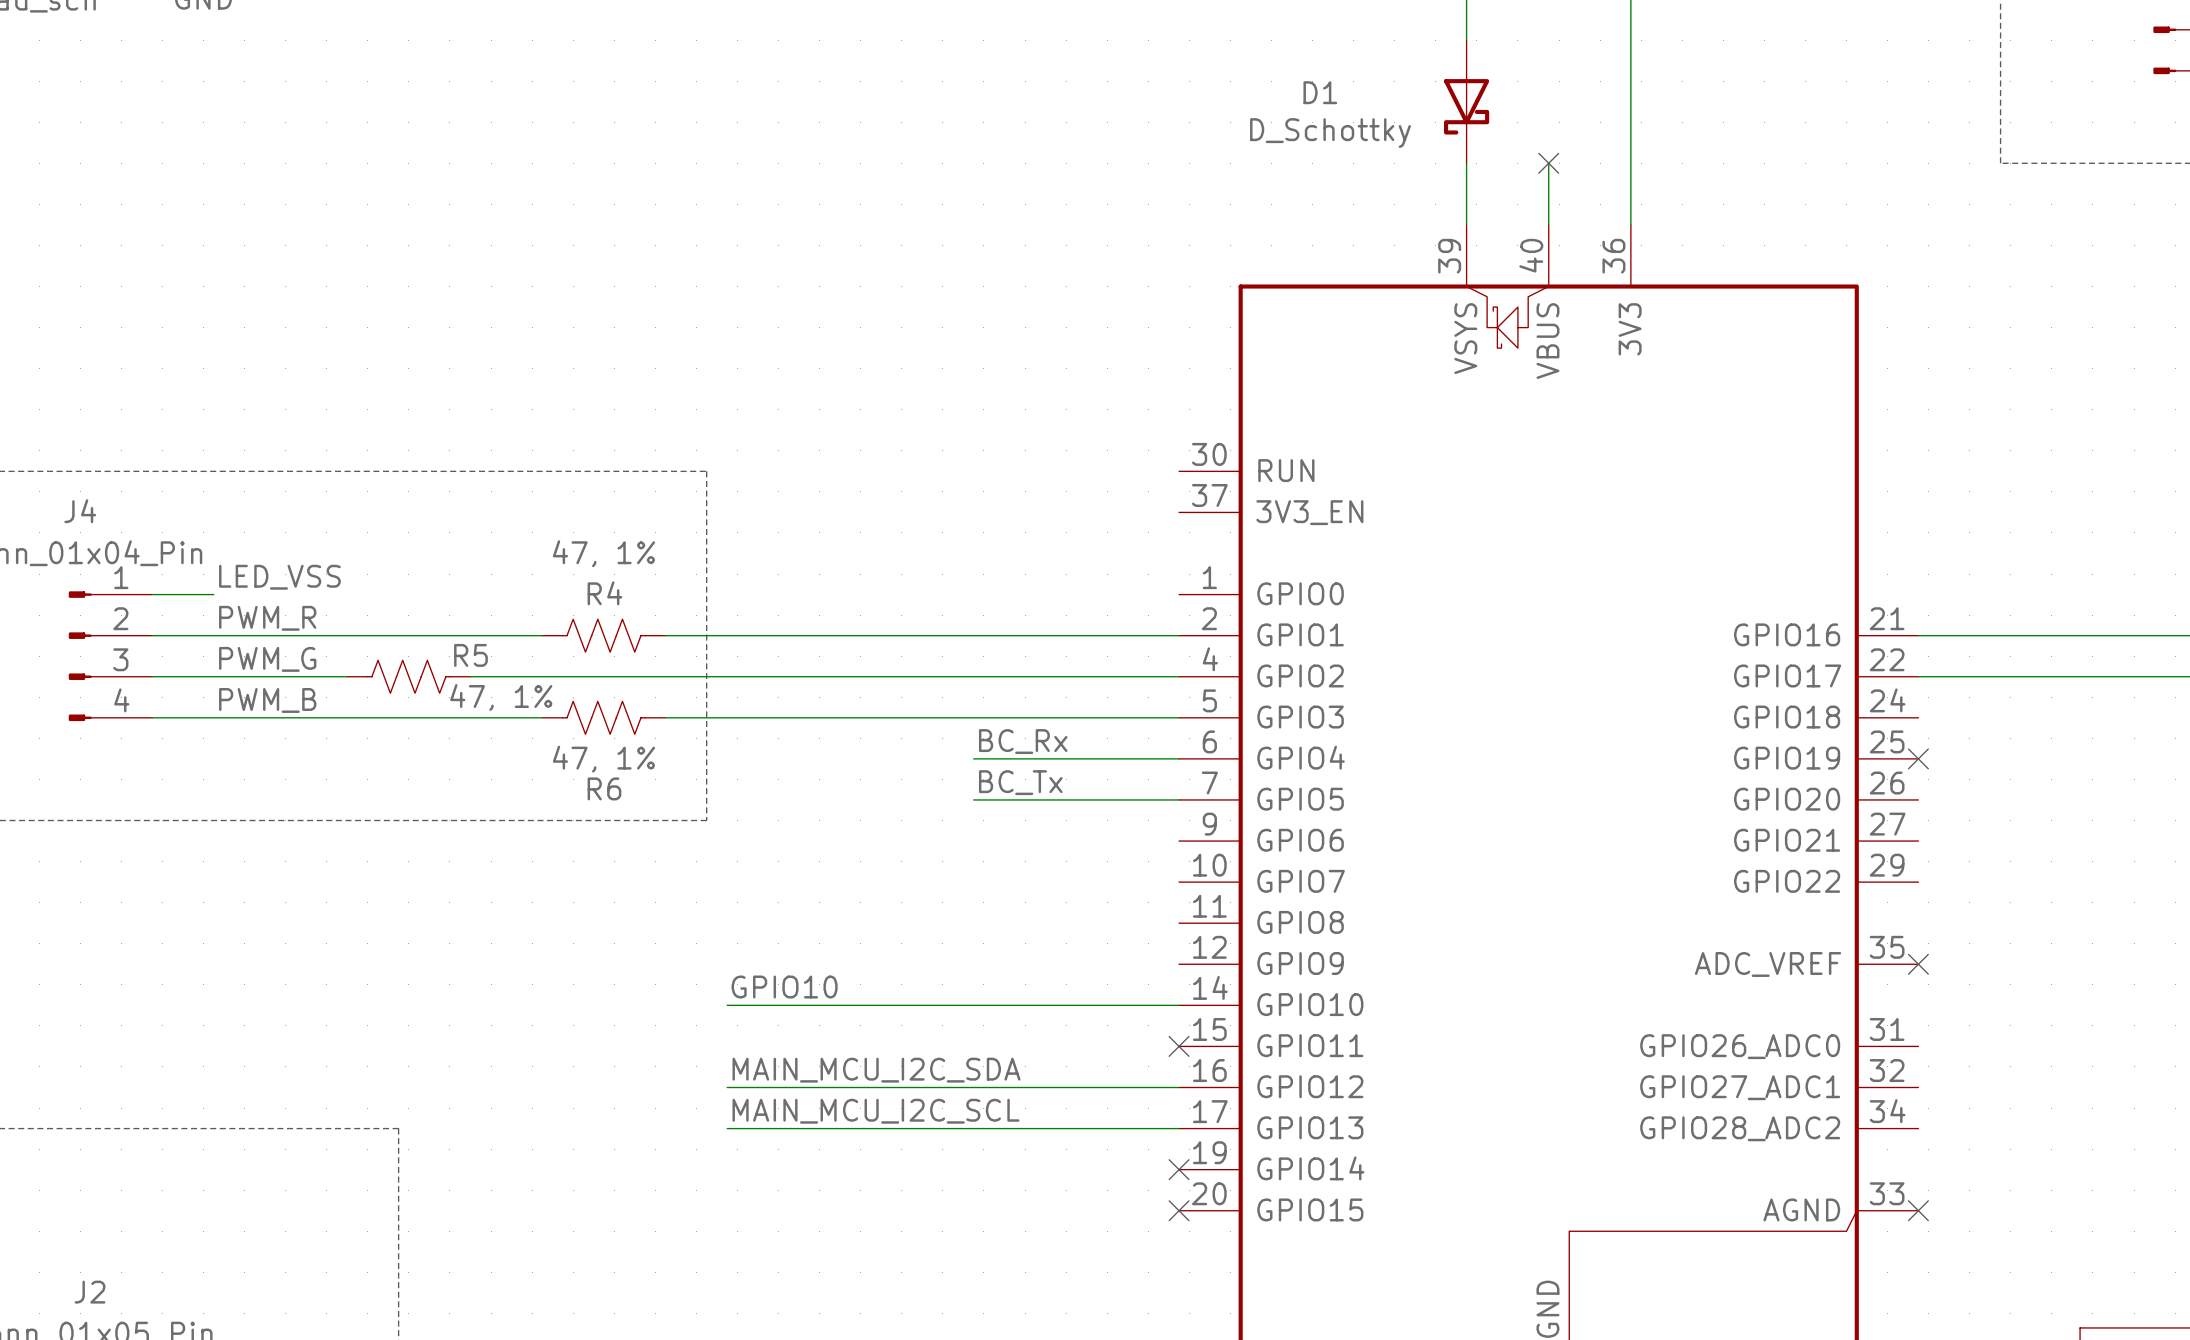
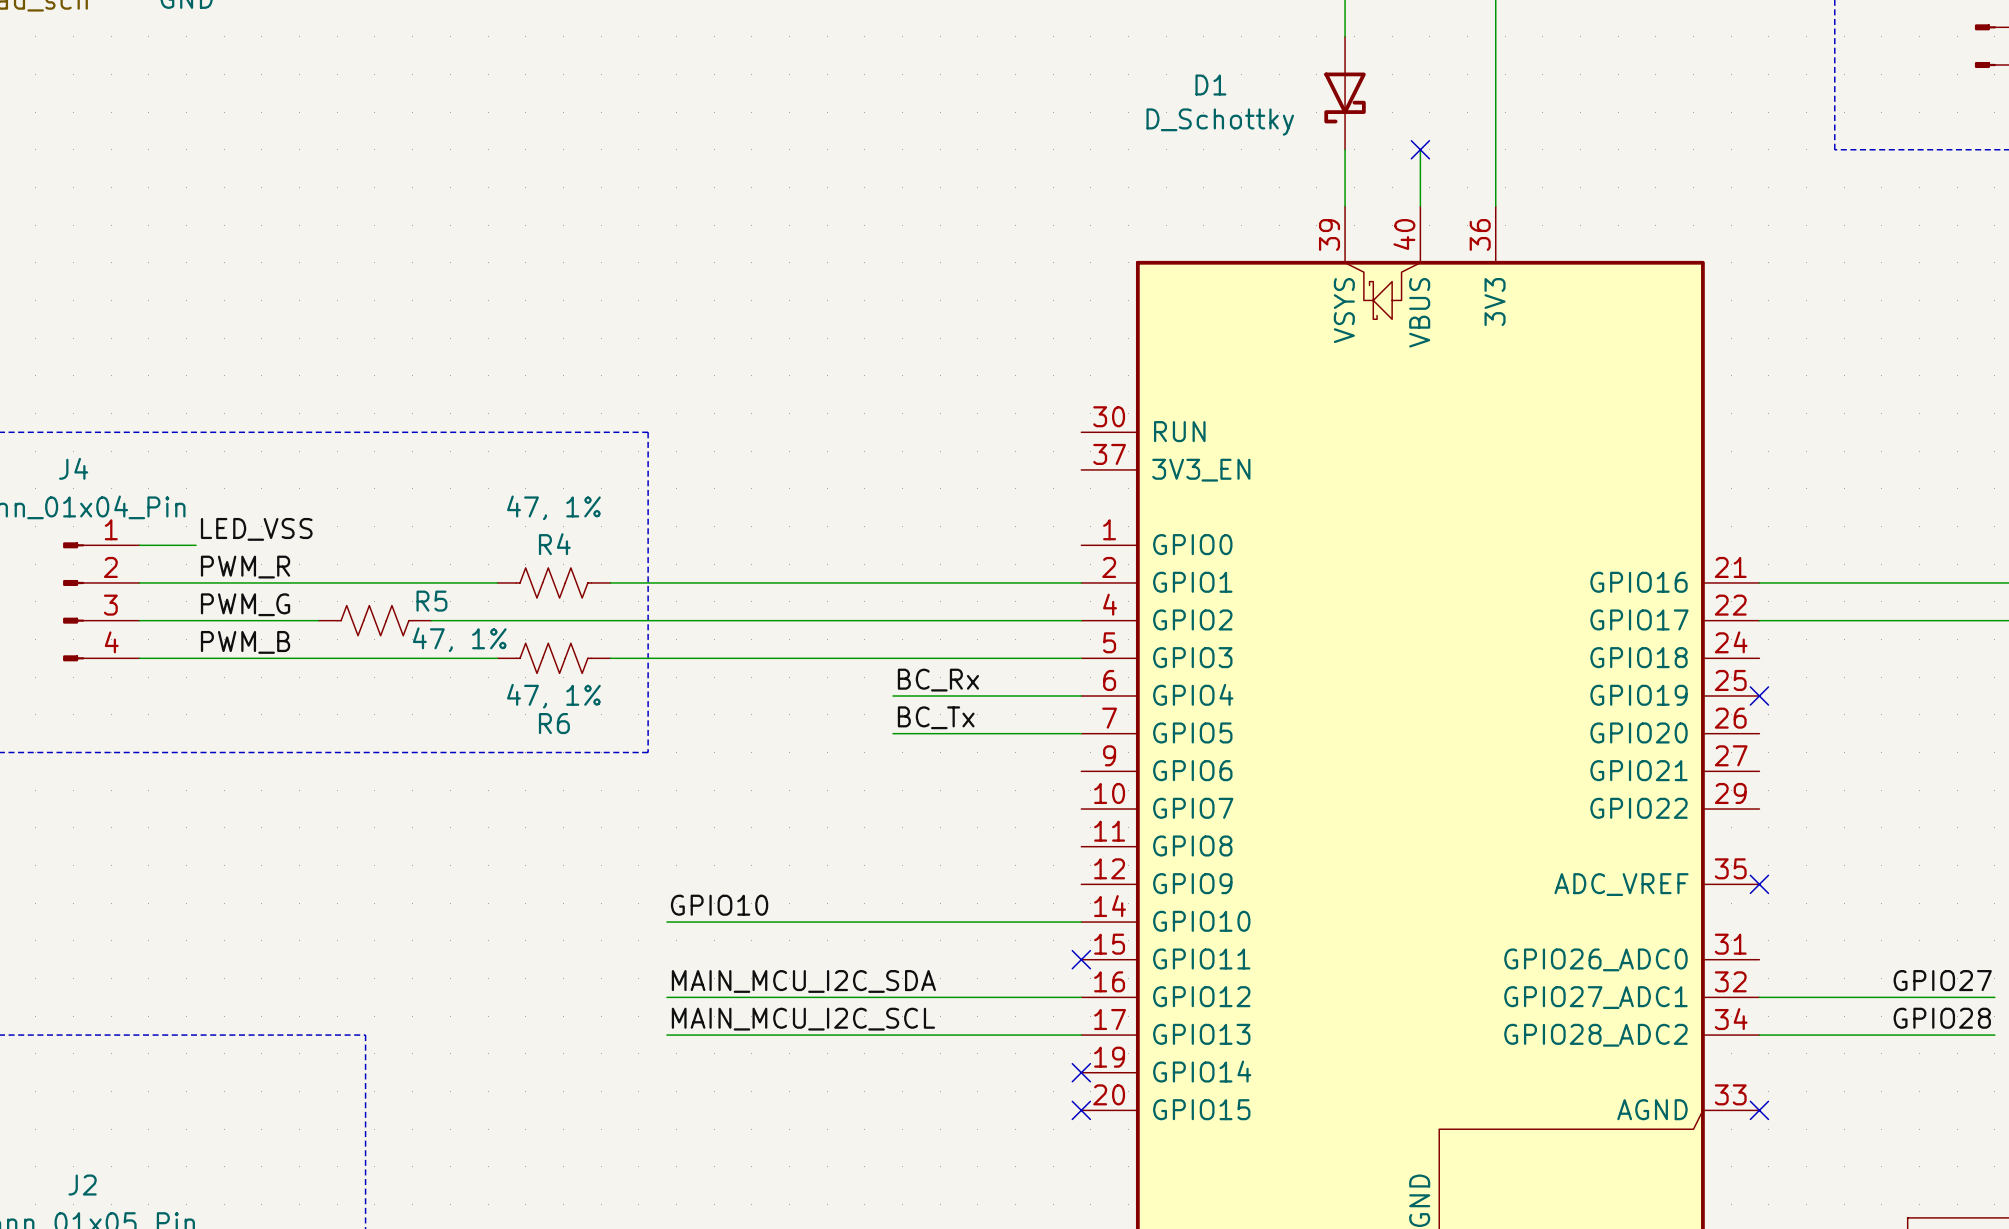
label: none -> GPIO27 (1942, 980)
wire: none -> (1759, 997) (1994, 997)
label: none -> GPIO28 (1942, 1018)
wire: none -> (1759, 1035) (1994, 1035)

